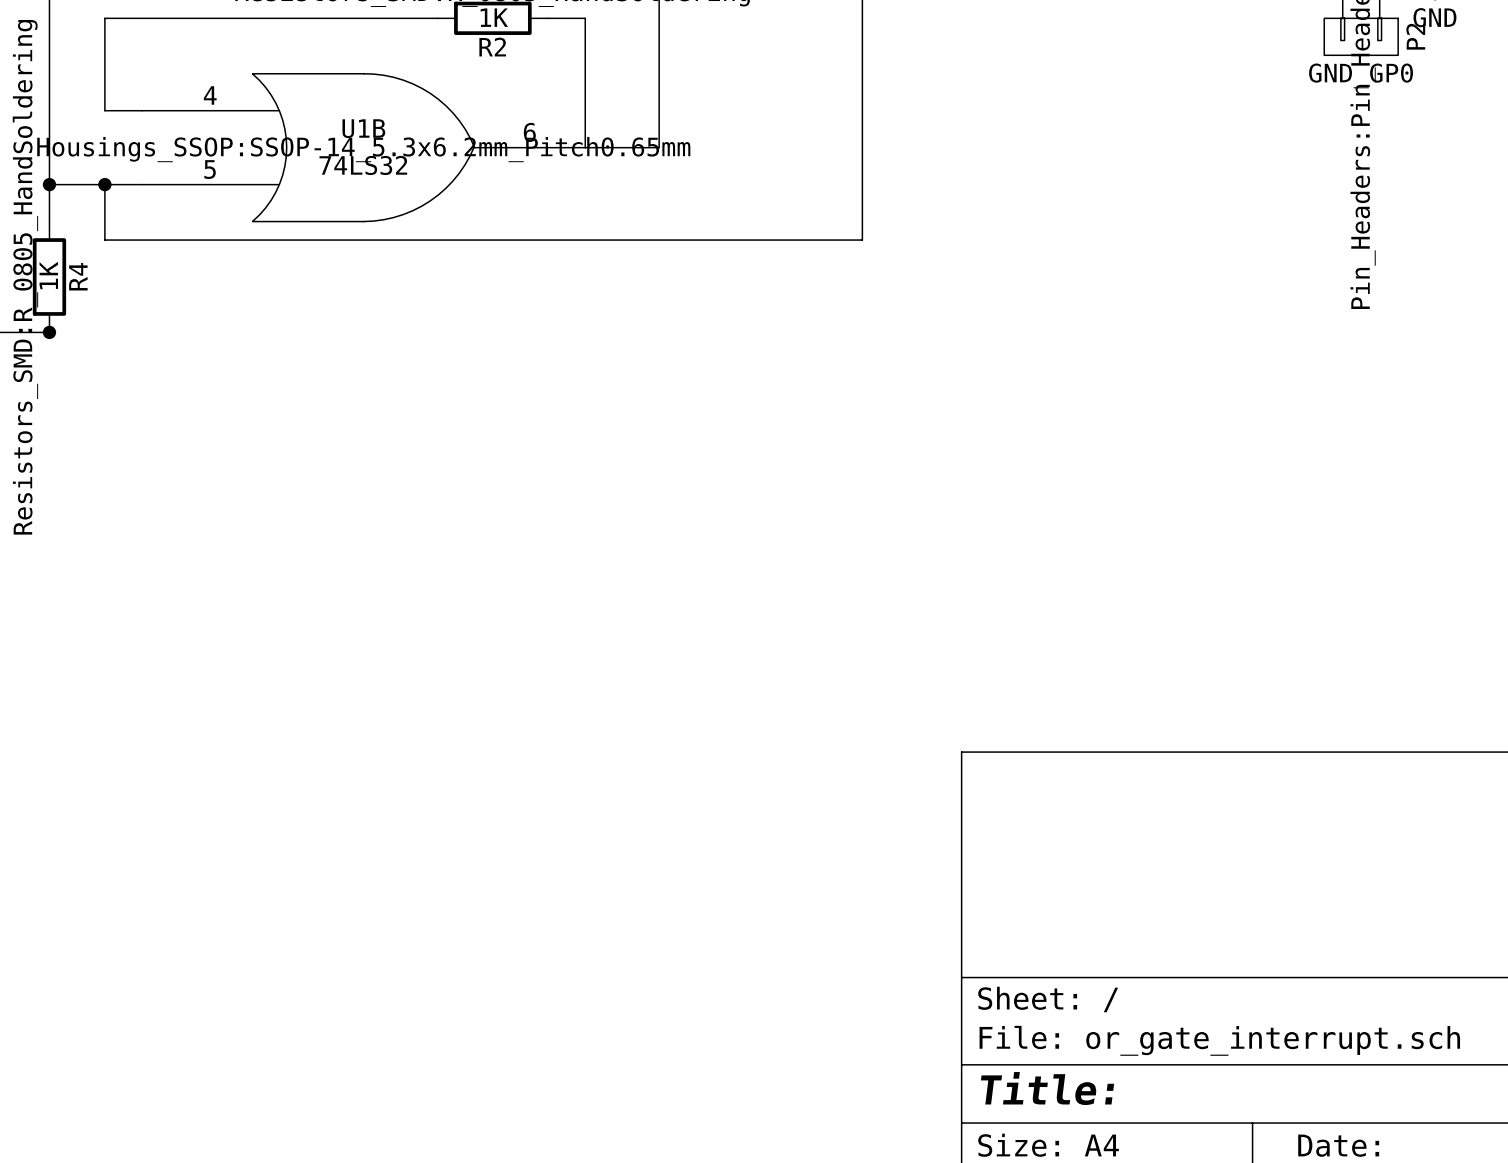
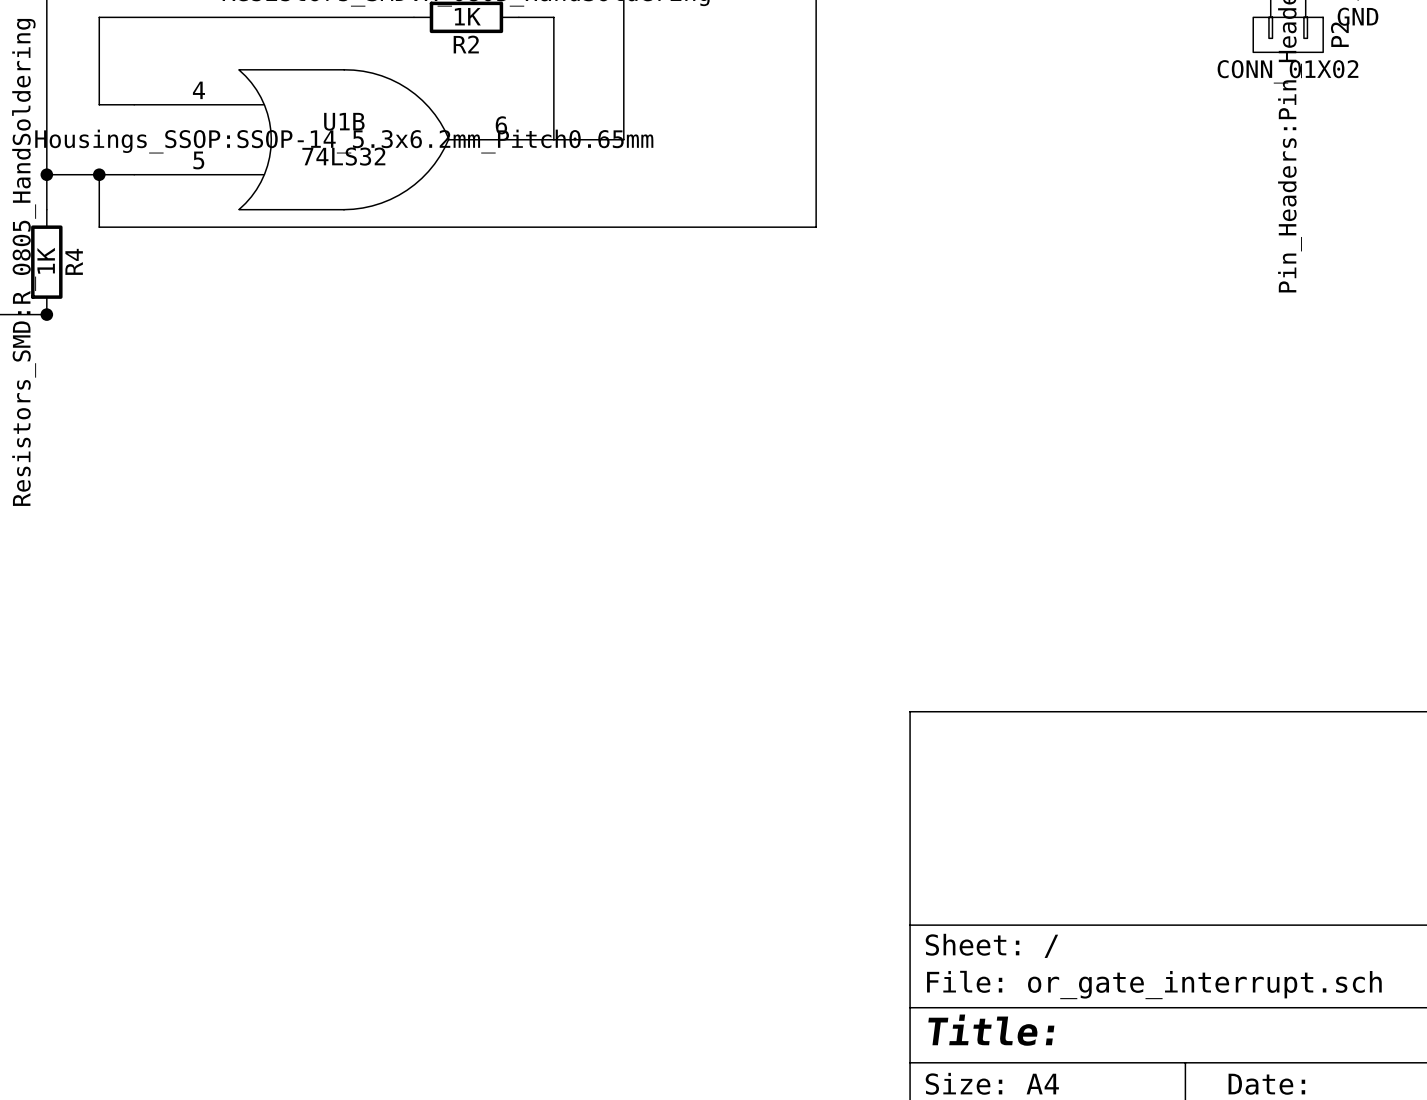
P2 value: GND_GP0 (1361, 75) -> CONN_01X02 (1288, 71)

